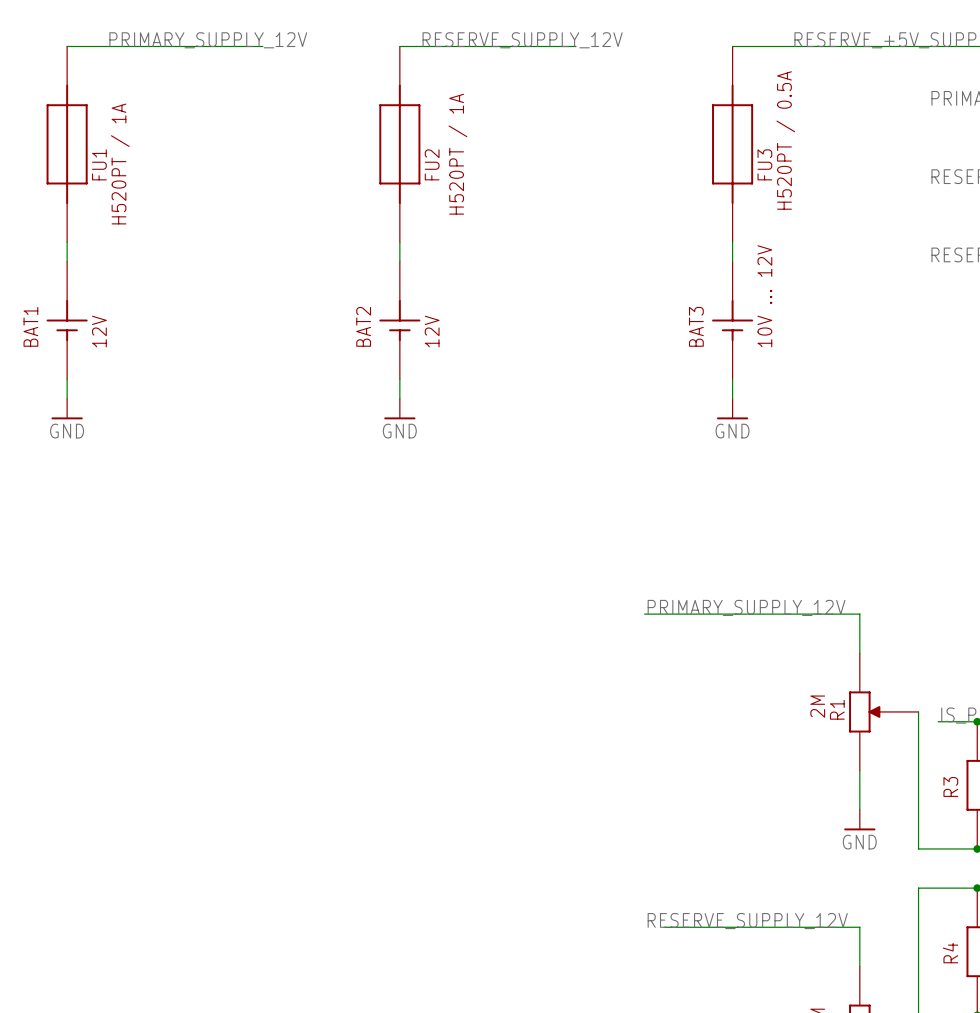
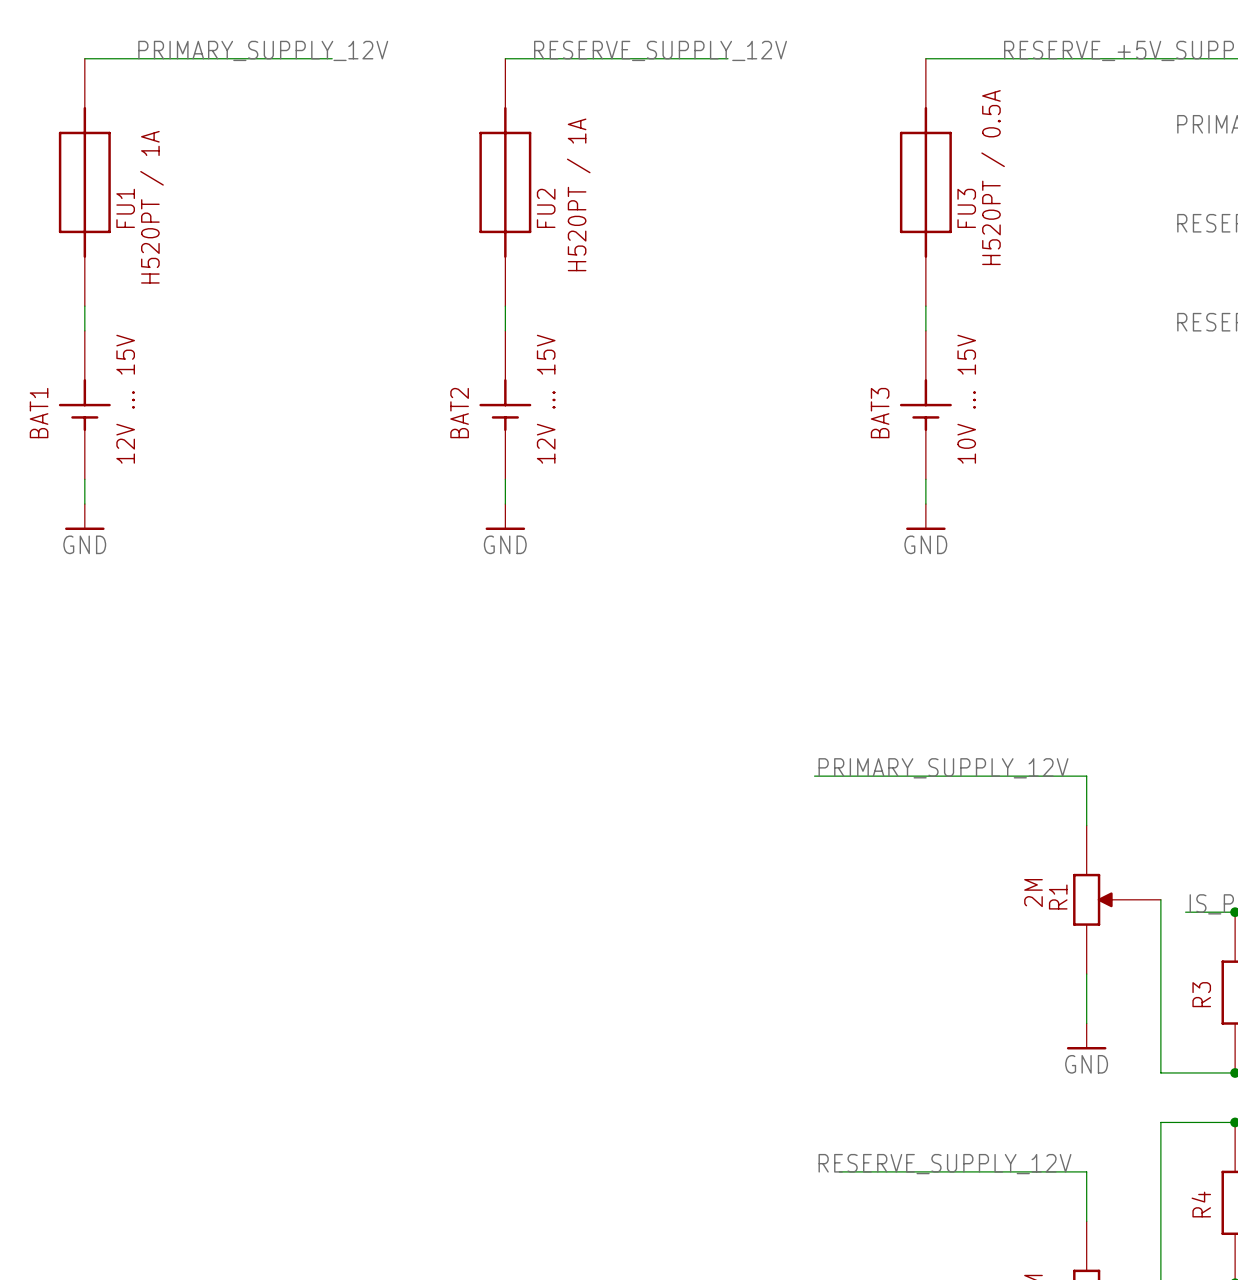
BAT3 value: 10V ... 12V (764, 296) -> 10V ... 15V (966, 399)
BAT1 value: 12V (99, 331) -> 12V ... 15V (125, 399)
BAT2 value: 12V (432, 331) -> 12V ... 15V (546, 399)

